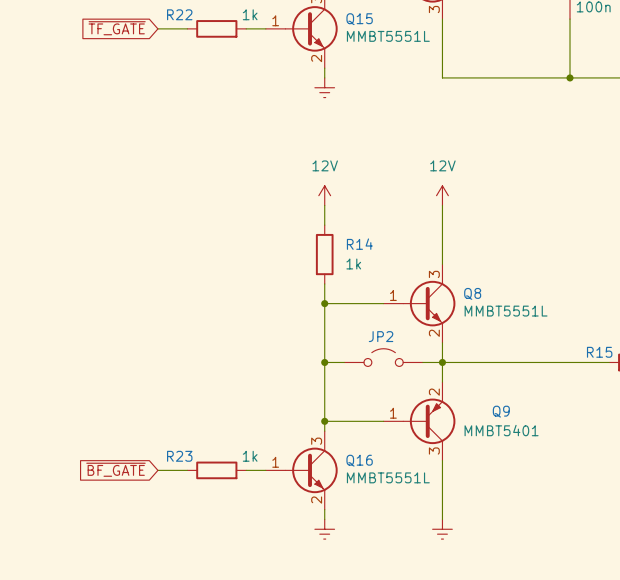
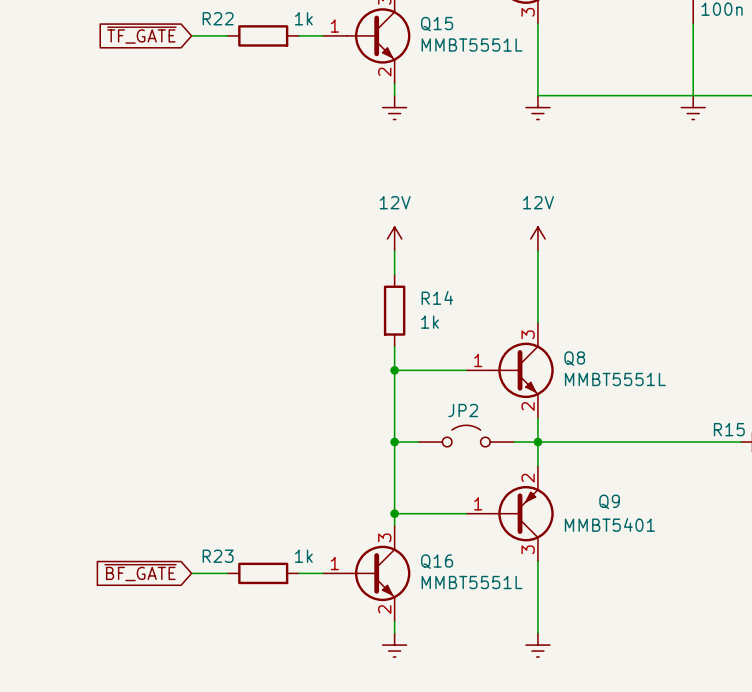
junction: (570, 77) -> none
power symbol: none -> (537, 107)
power symbol: none -> (693, 107)

